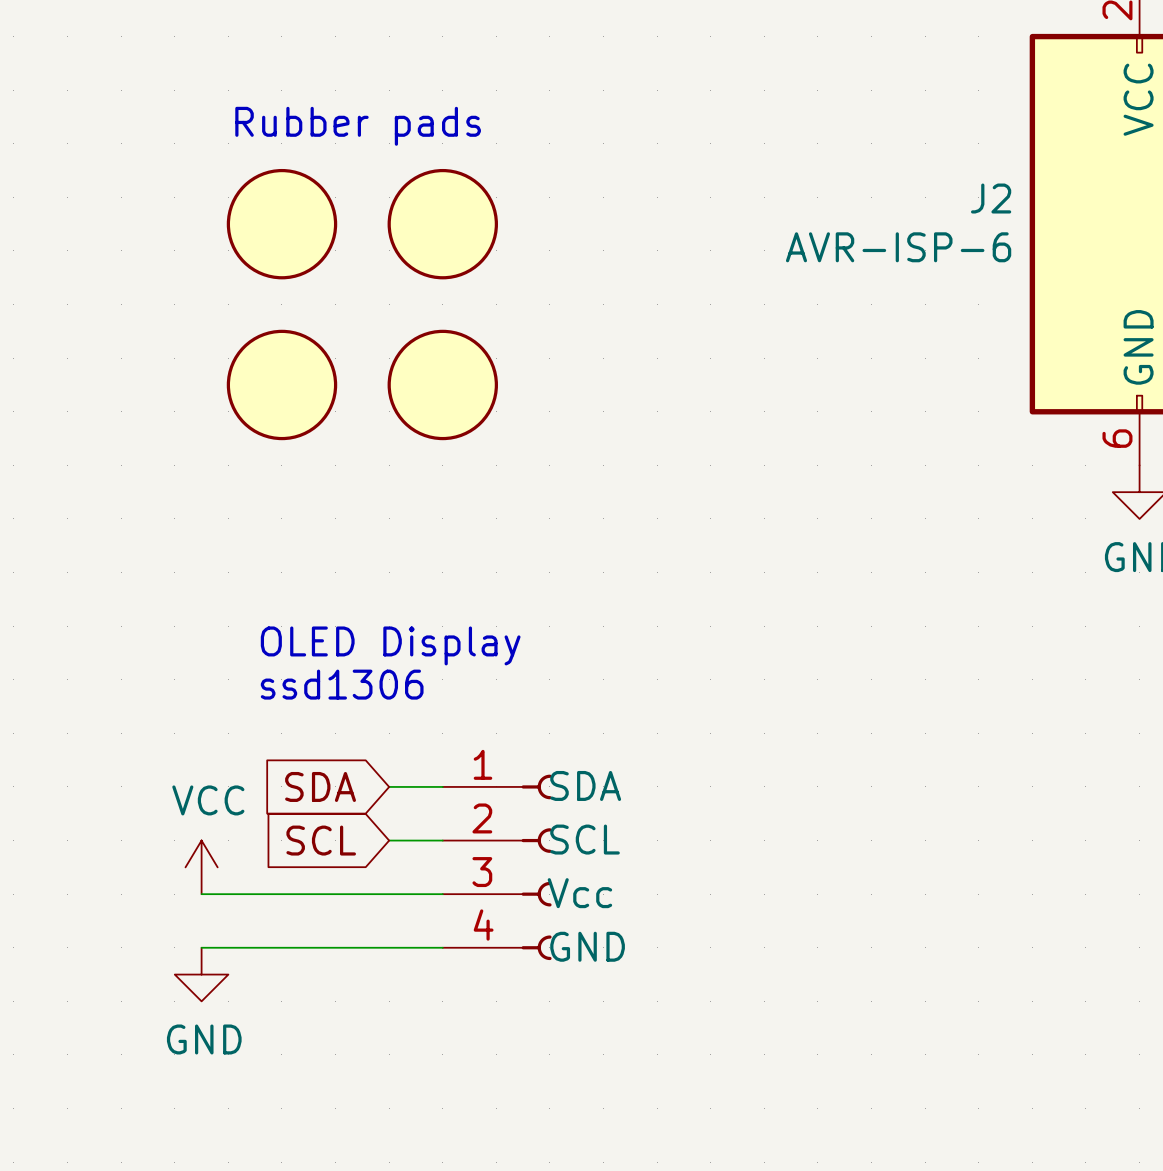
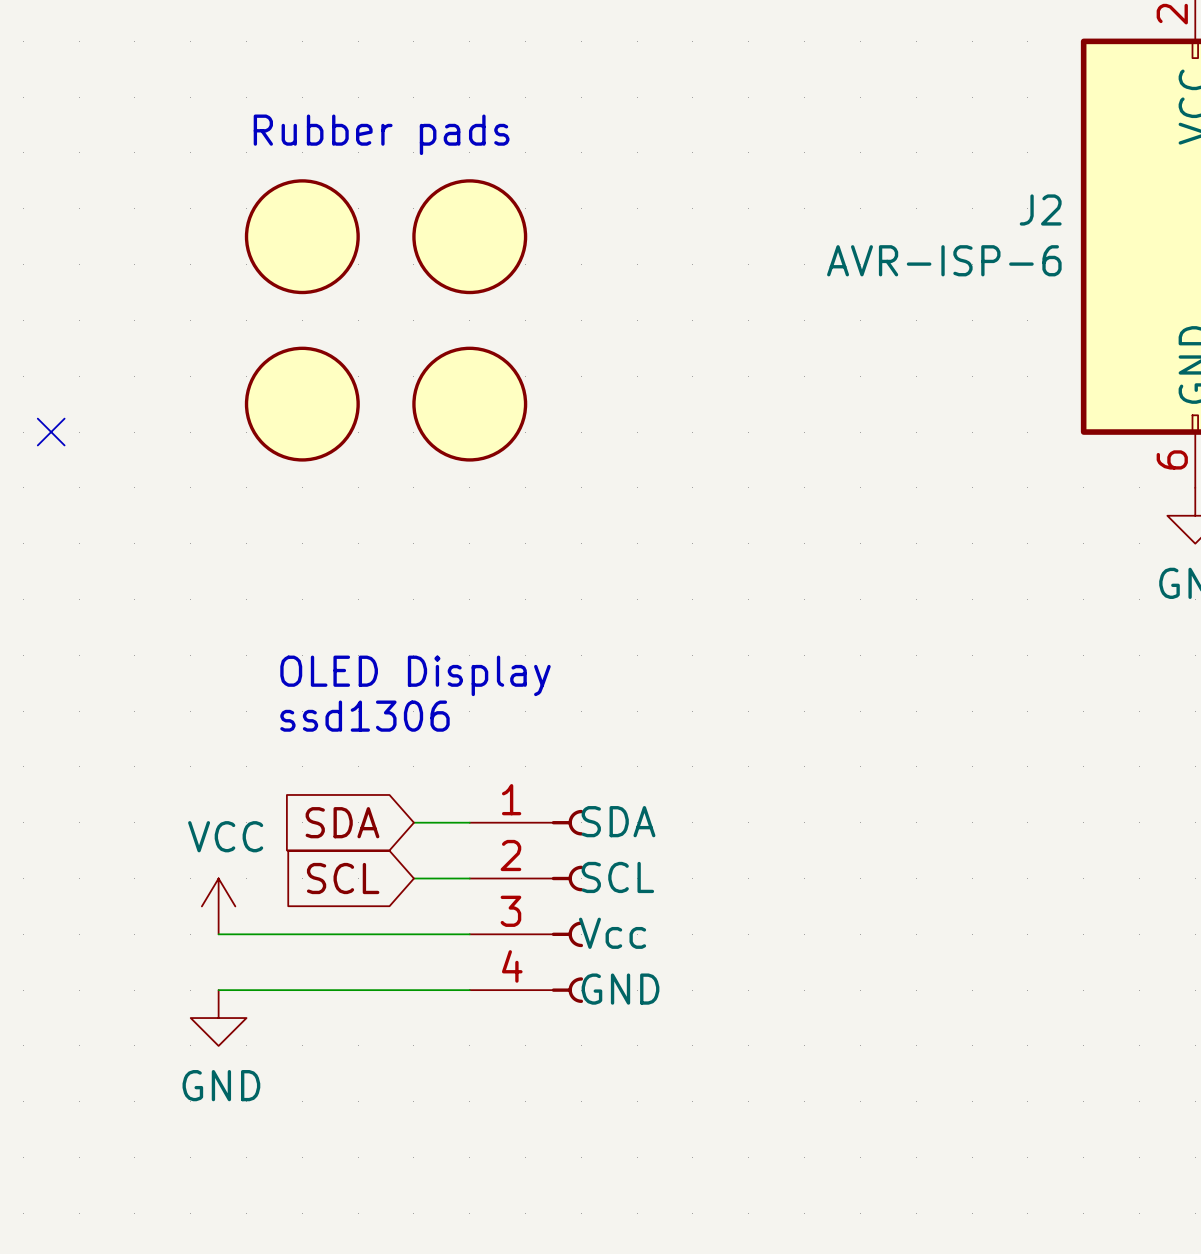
no-connect mark: none -> (51, 432)

